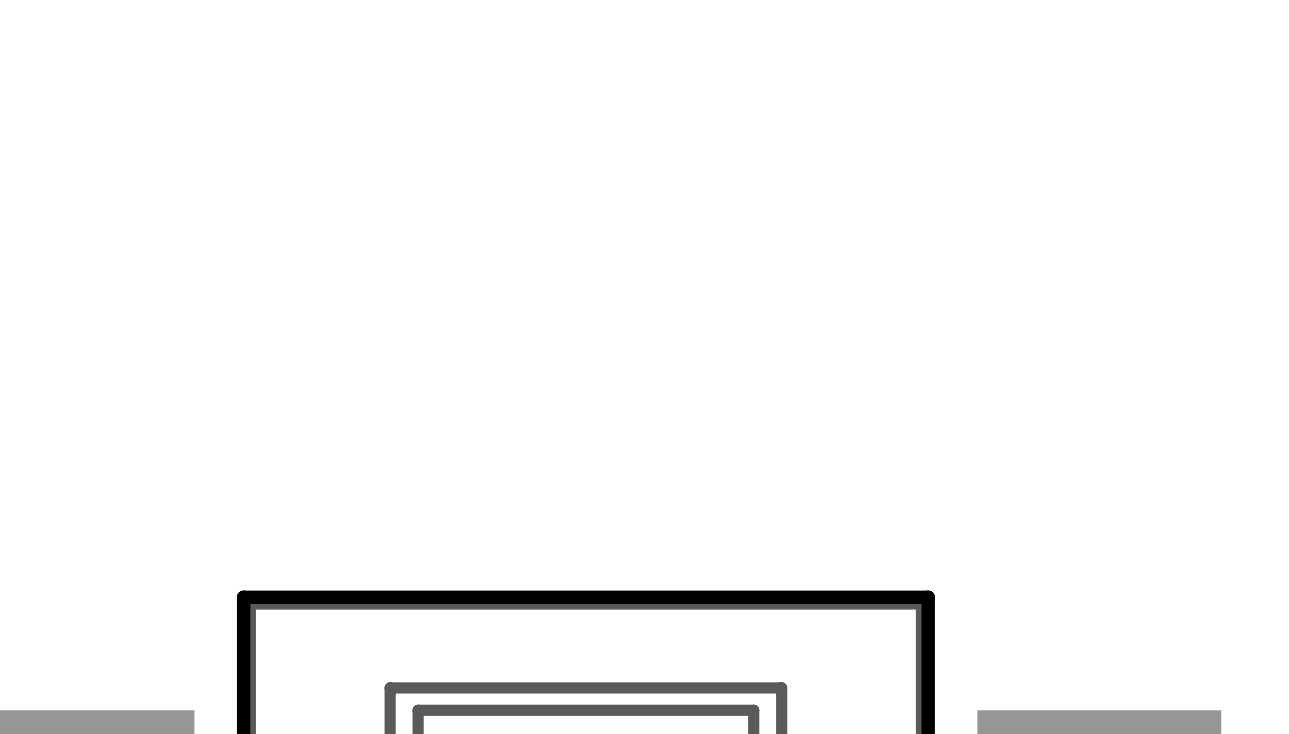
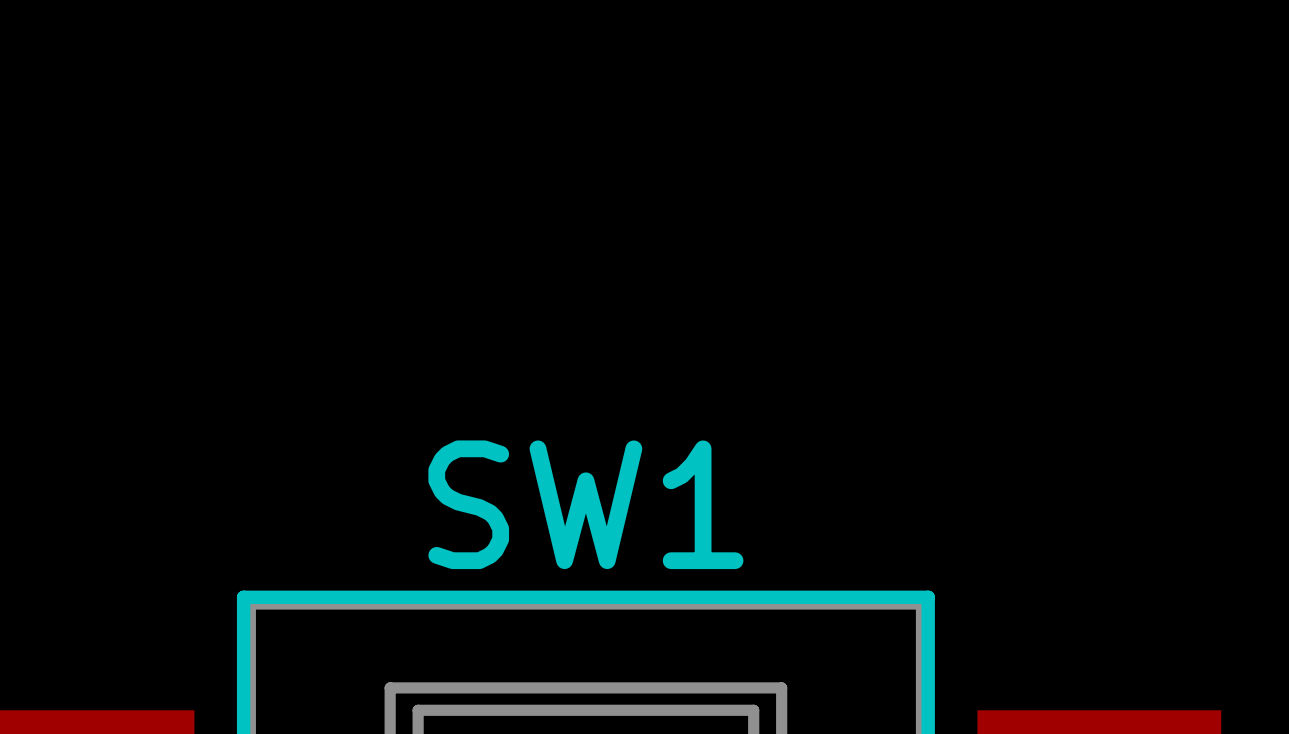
SW1 name: none -> SW1 (585, 504)

